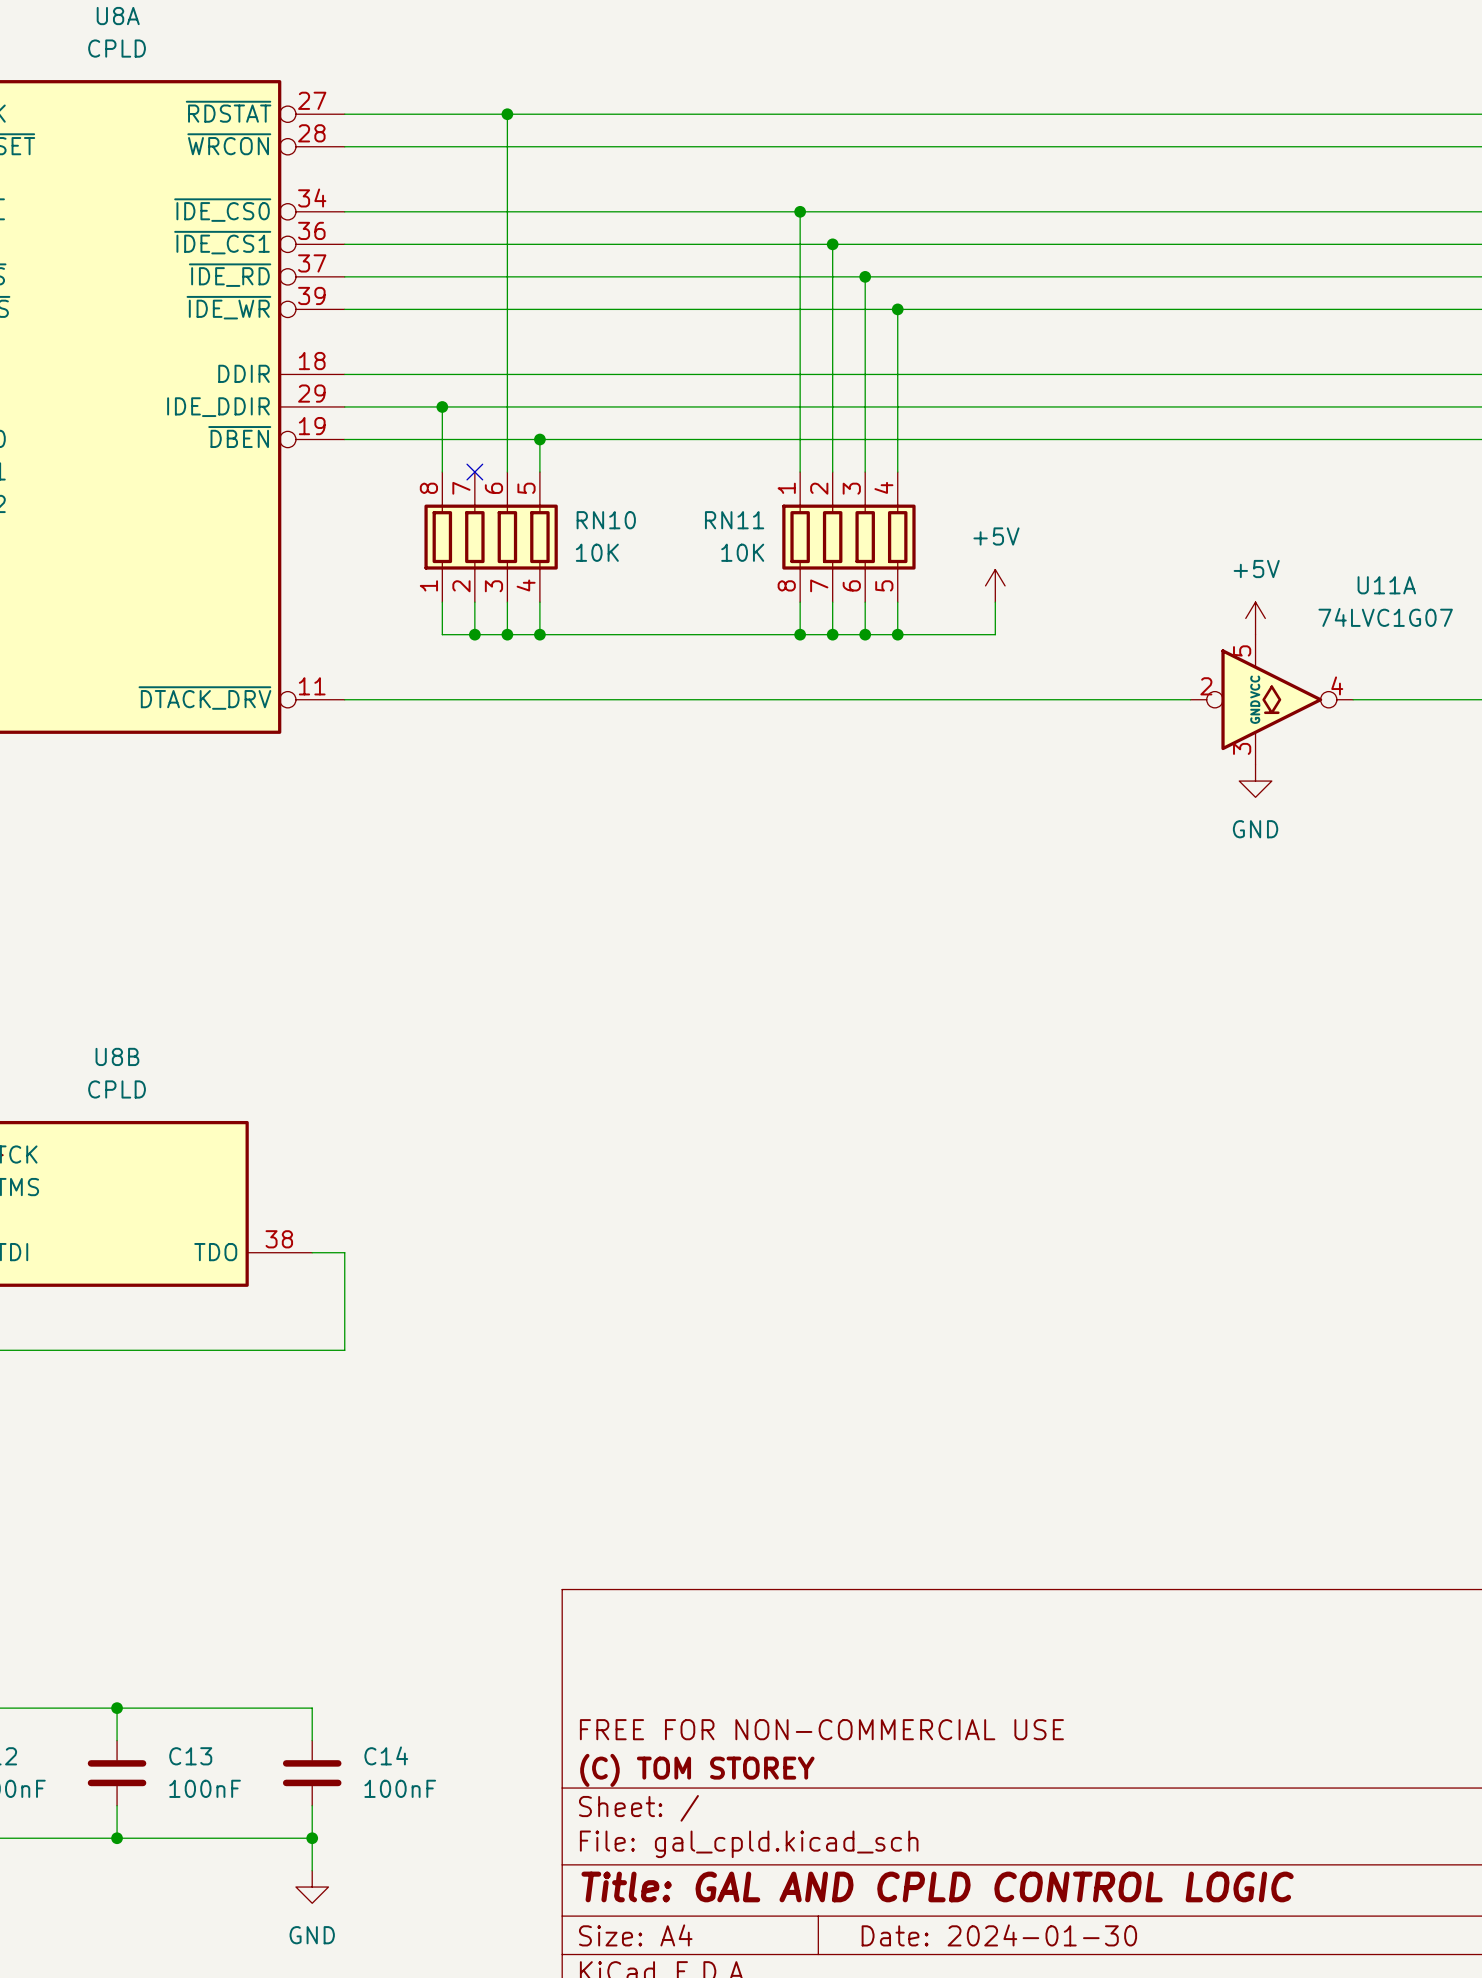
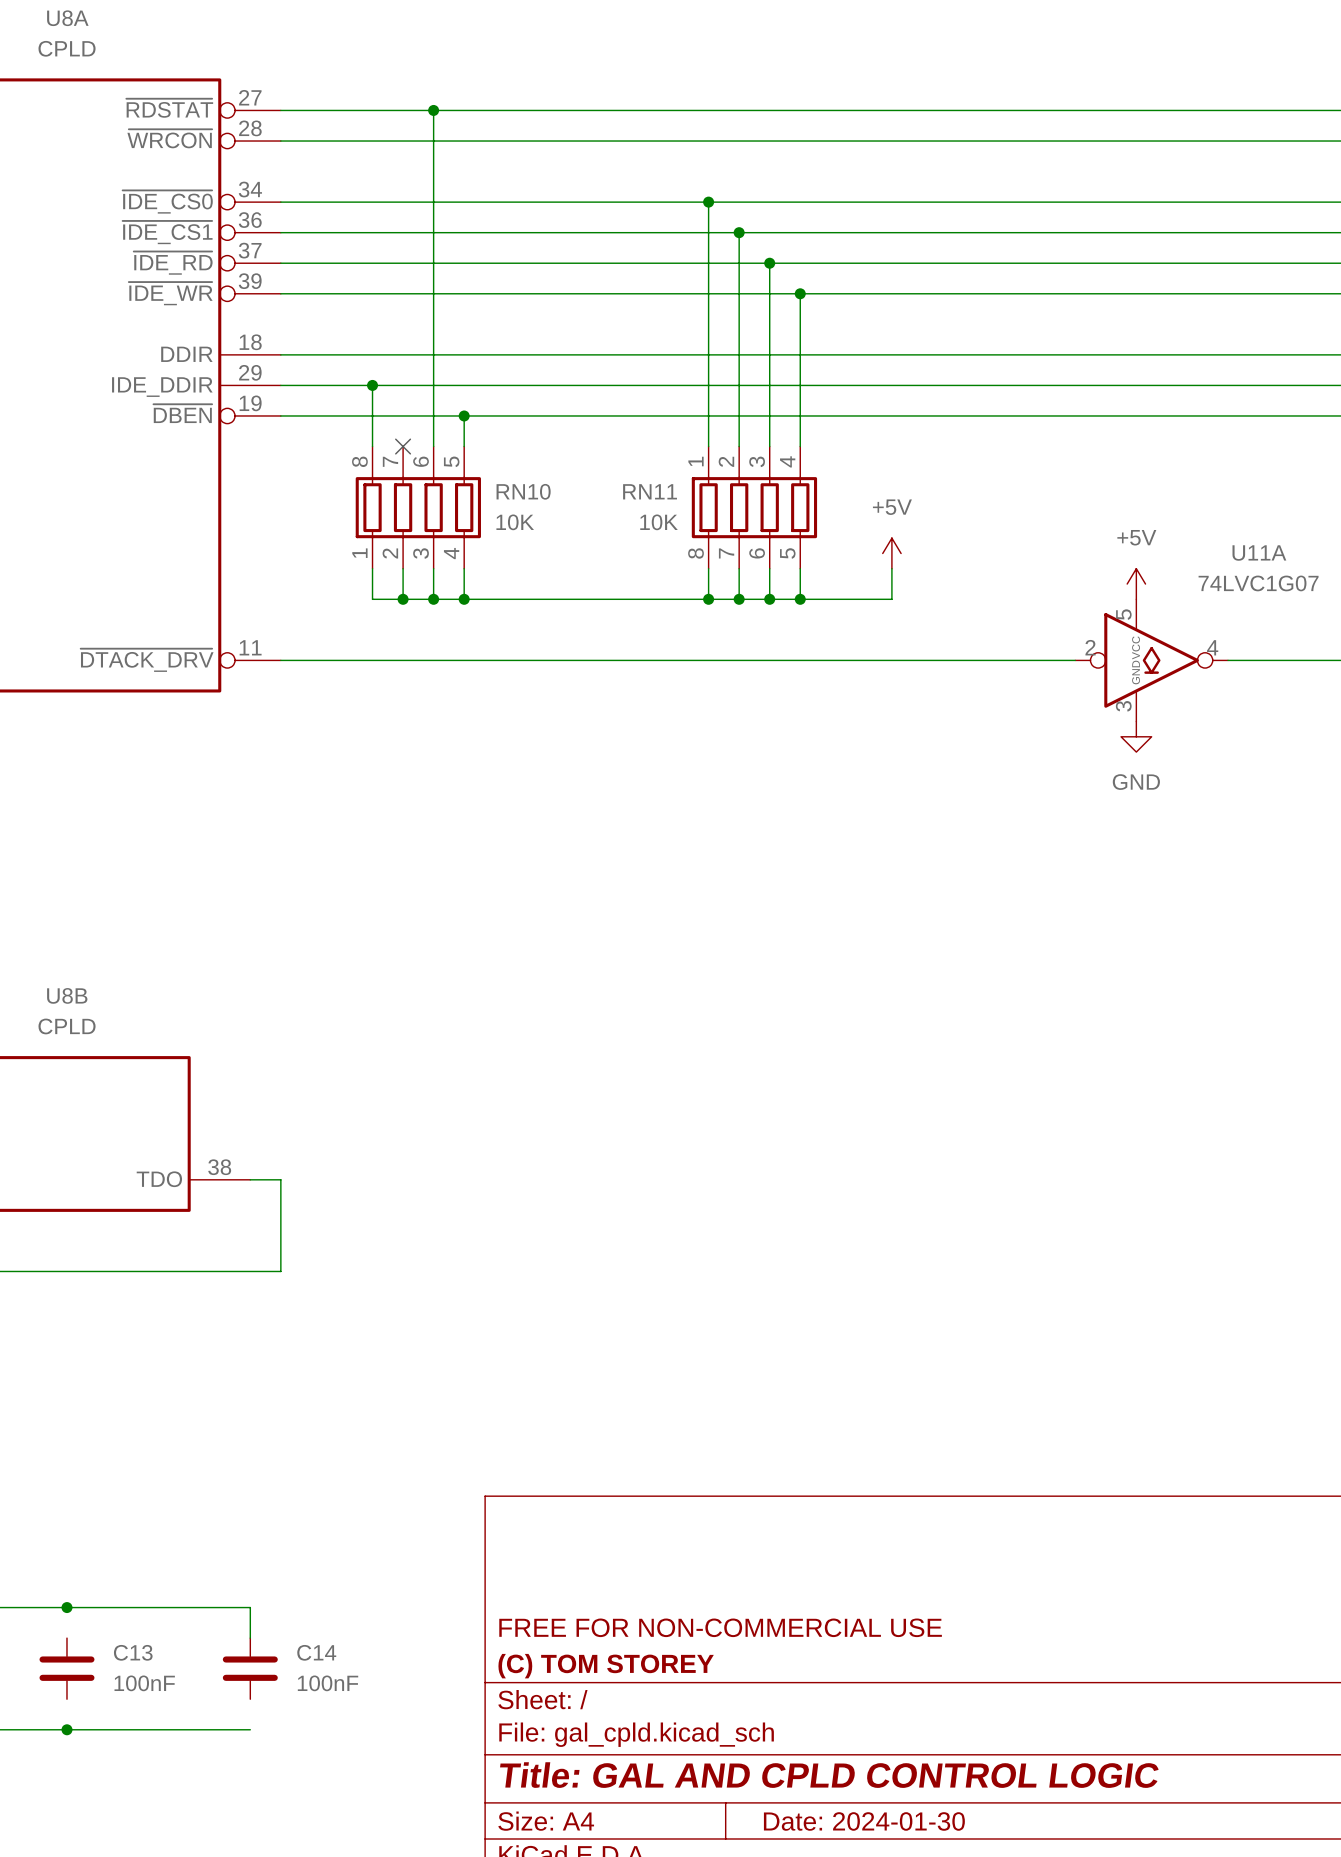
wire: (117, 1708) (117, 1740) -> none
wire: (117, 1805) (117, 1838) -> none
wire: (312, 1805) (312, 1870) -> none
junction: (312, 1838) -> none
power symbol: GND (312, 1887) -> none

